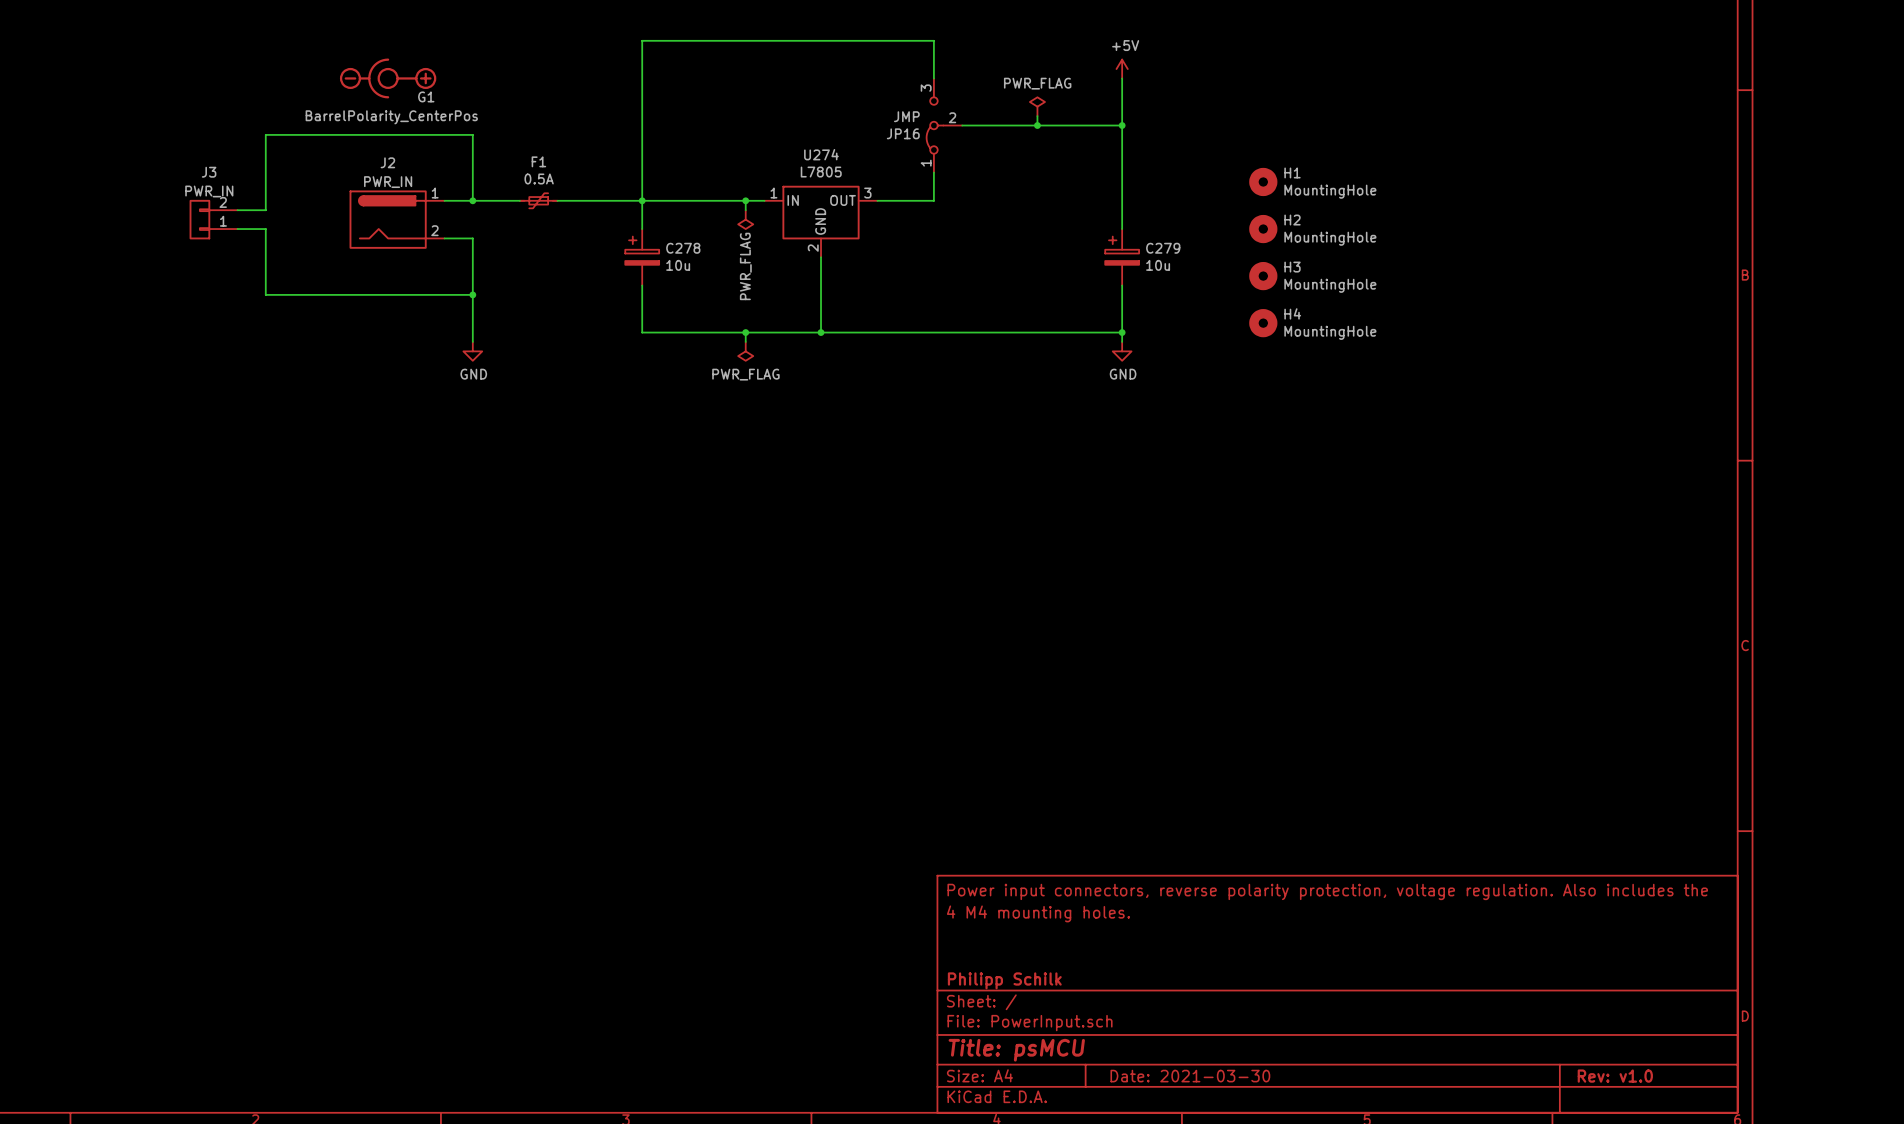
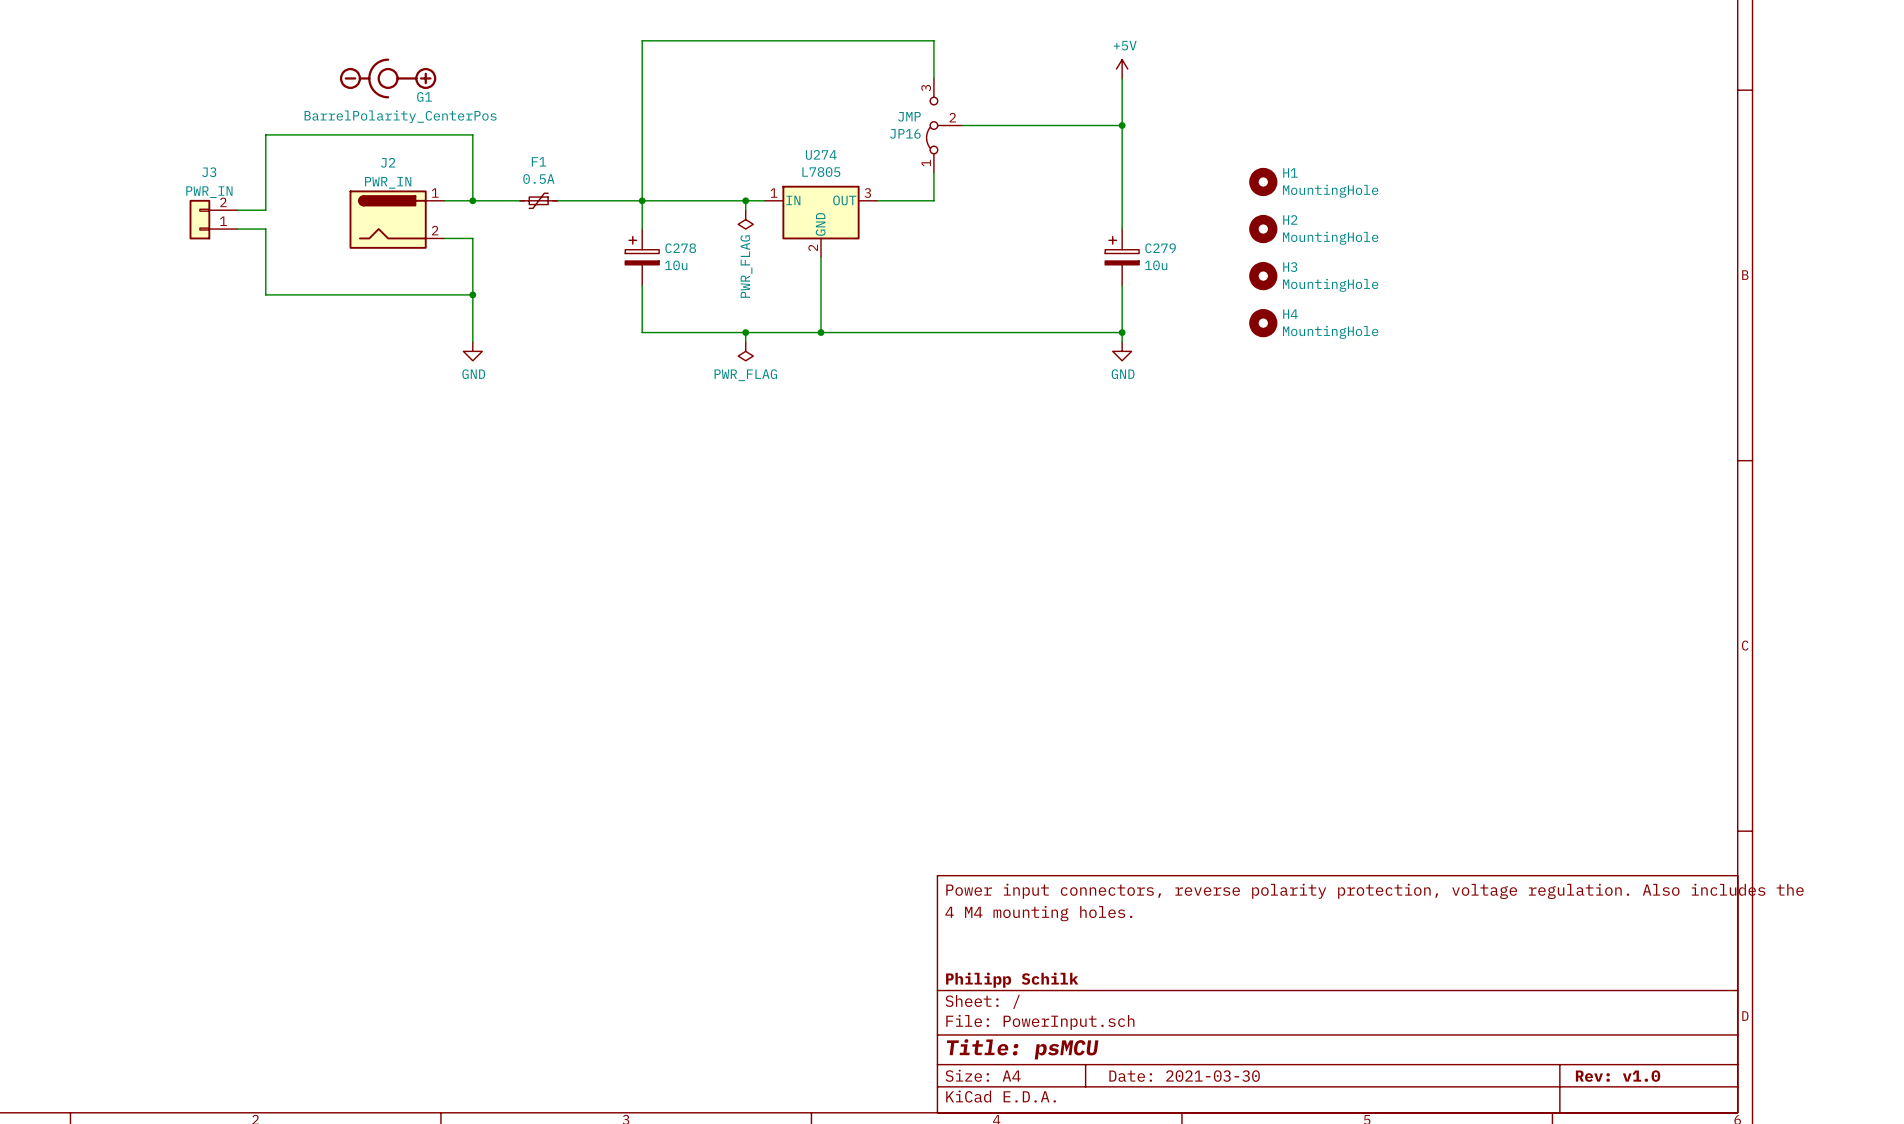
power symbol: PWR_FLAG (1037, 106) -> none
wire: (1037, 116) (1037, 125) -> none
junction: (1037, 125) -> none

